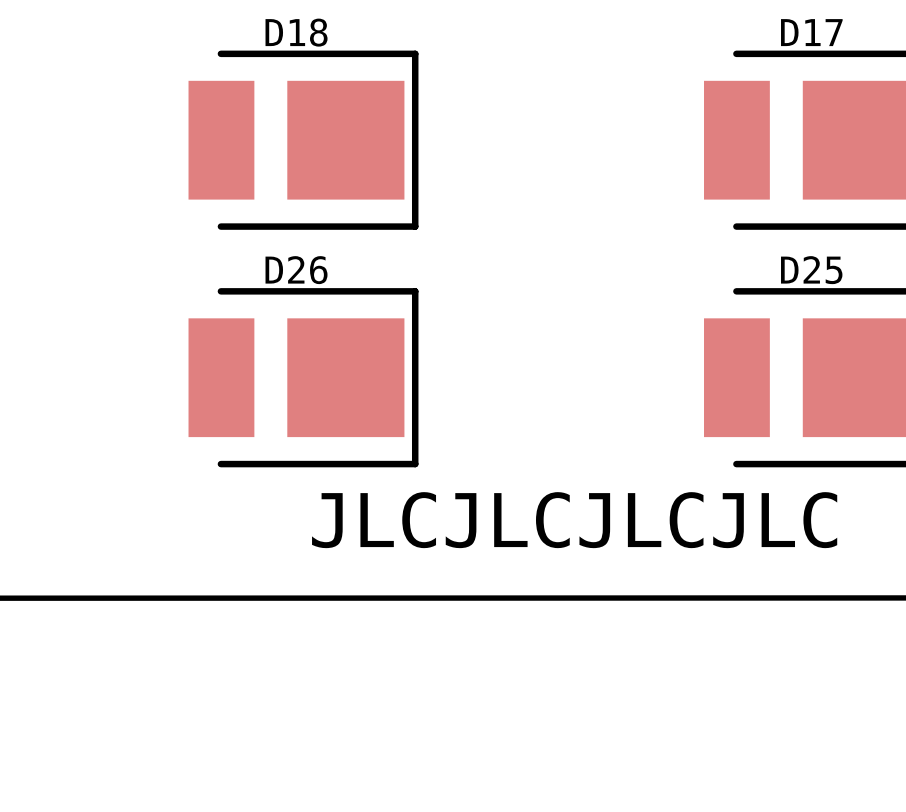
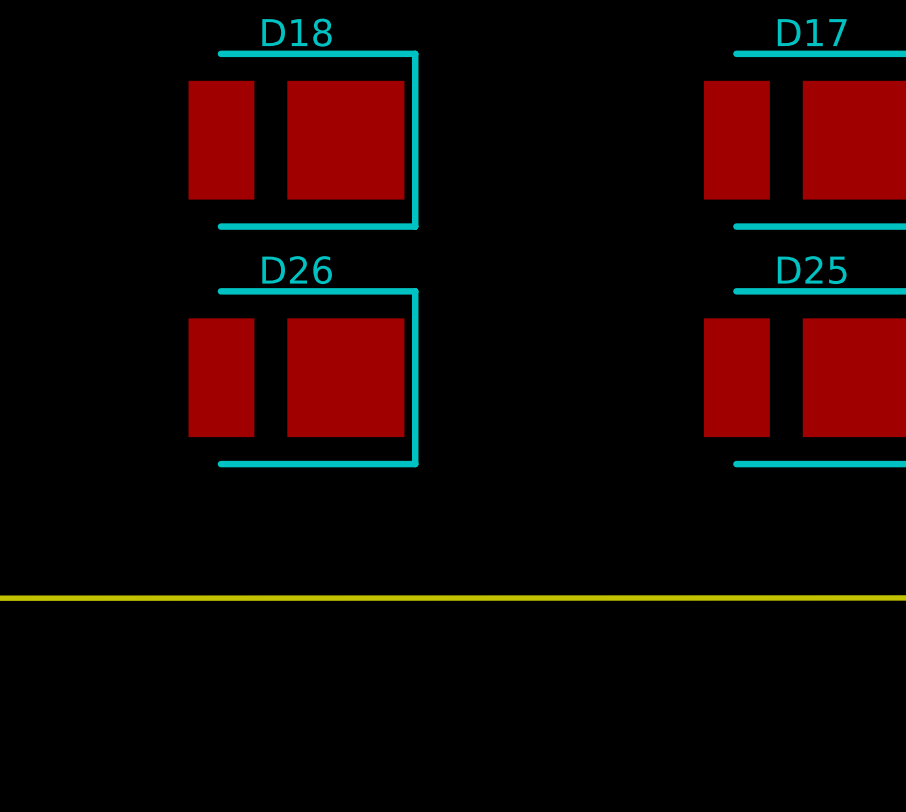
text: JLCJLCJLCJLC (574, 520) -> none

